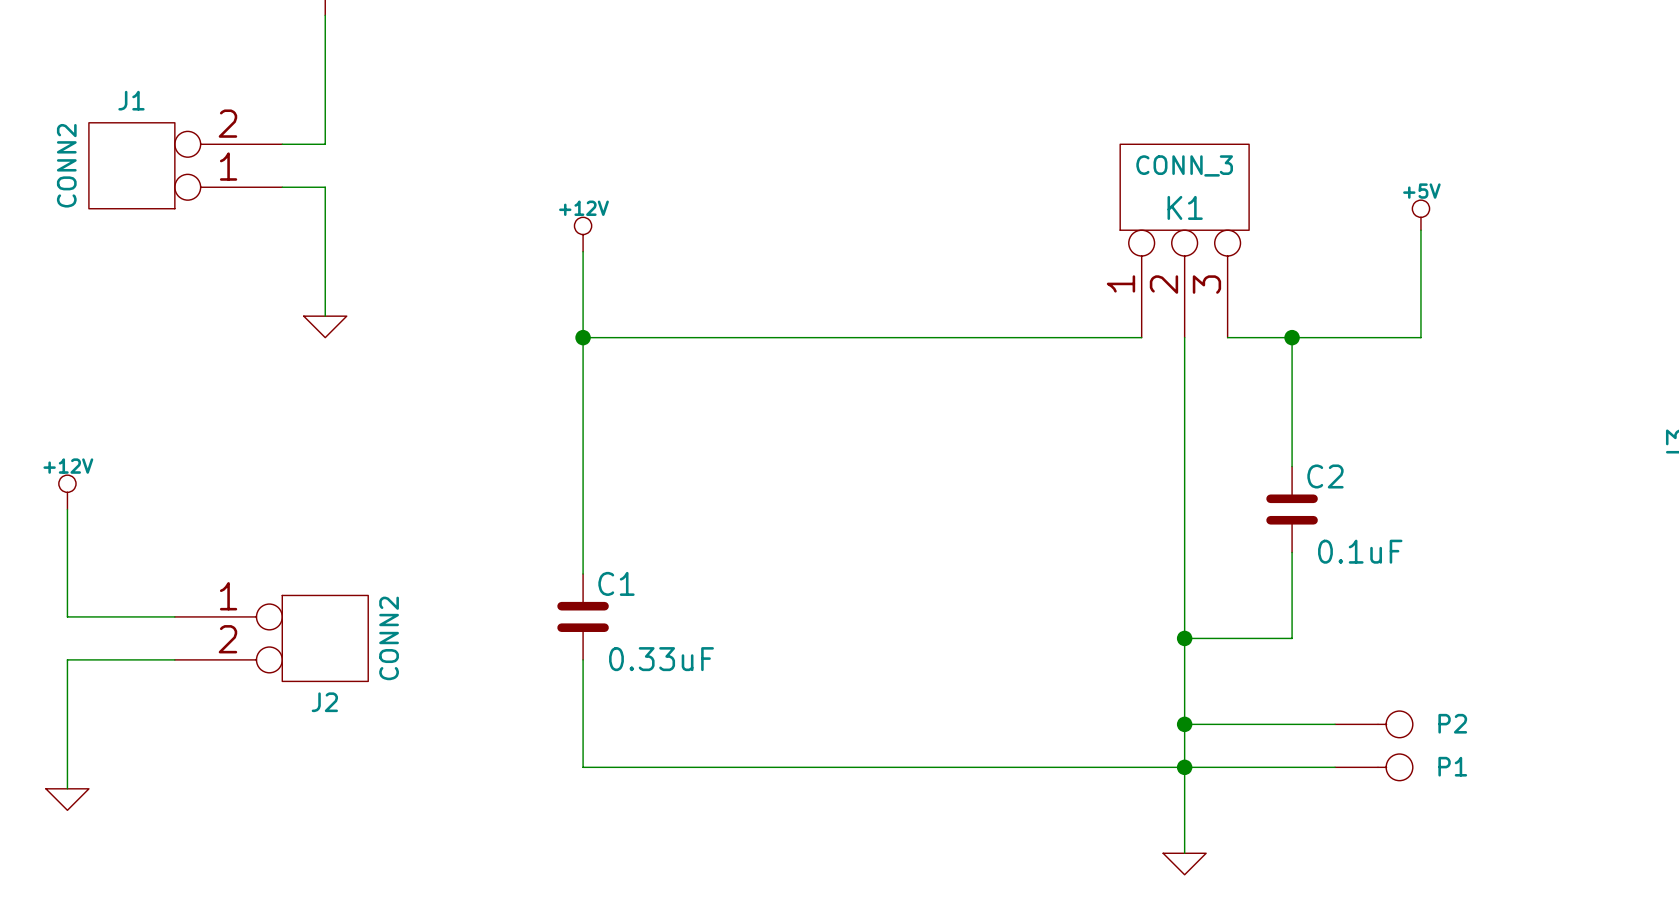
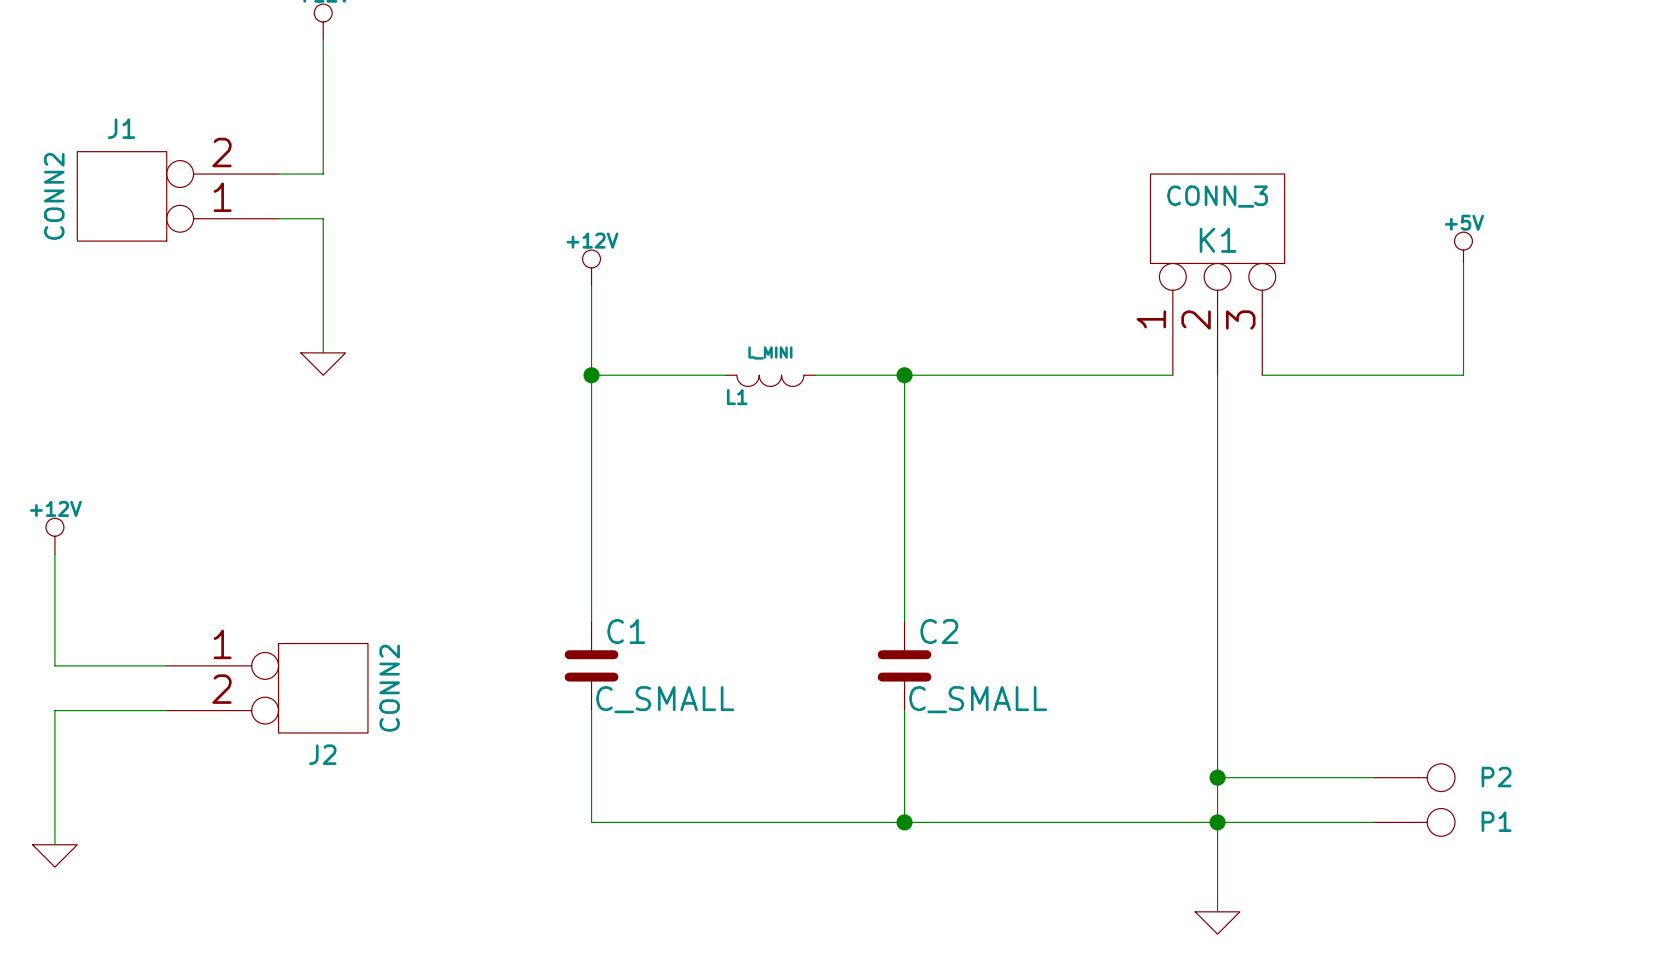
wire: (711, 337) (797, 337) -> none
wire: none -> (904, 375) (904, 621)
junction: none -> (904, 375)
wire: (1292, 337) (1292, 466) -> none
junction: (1292, 337) -> none
L1: none -> L_MINI (770, 380)
C2 position: (1292, 509) -> (904, 665)
C2 value: 0.1uF (1360, 551) -> C_SMALL (978, 699)
wire: (1292, 552) (1292, 638) (1184, 638) -> none
junction: (1184, 638) -> none
C1 value: 0.33uF (661, 659) -> C_SMALL (665, 699)
wire: none -> (904, 710) (904, 822)
junction: none -> (904, 822)

